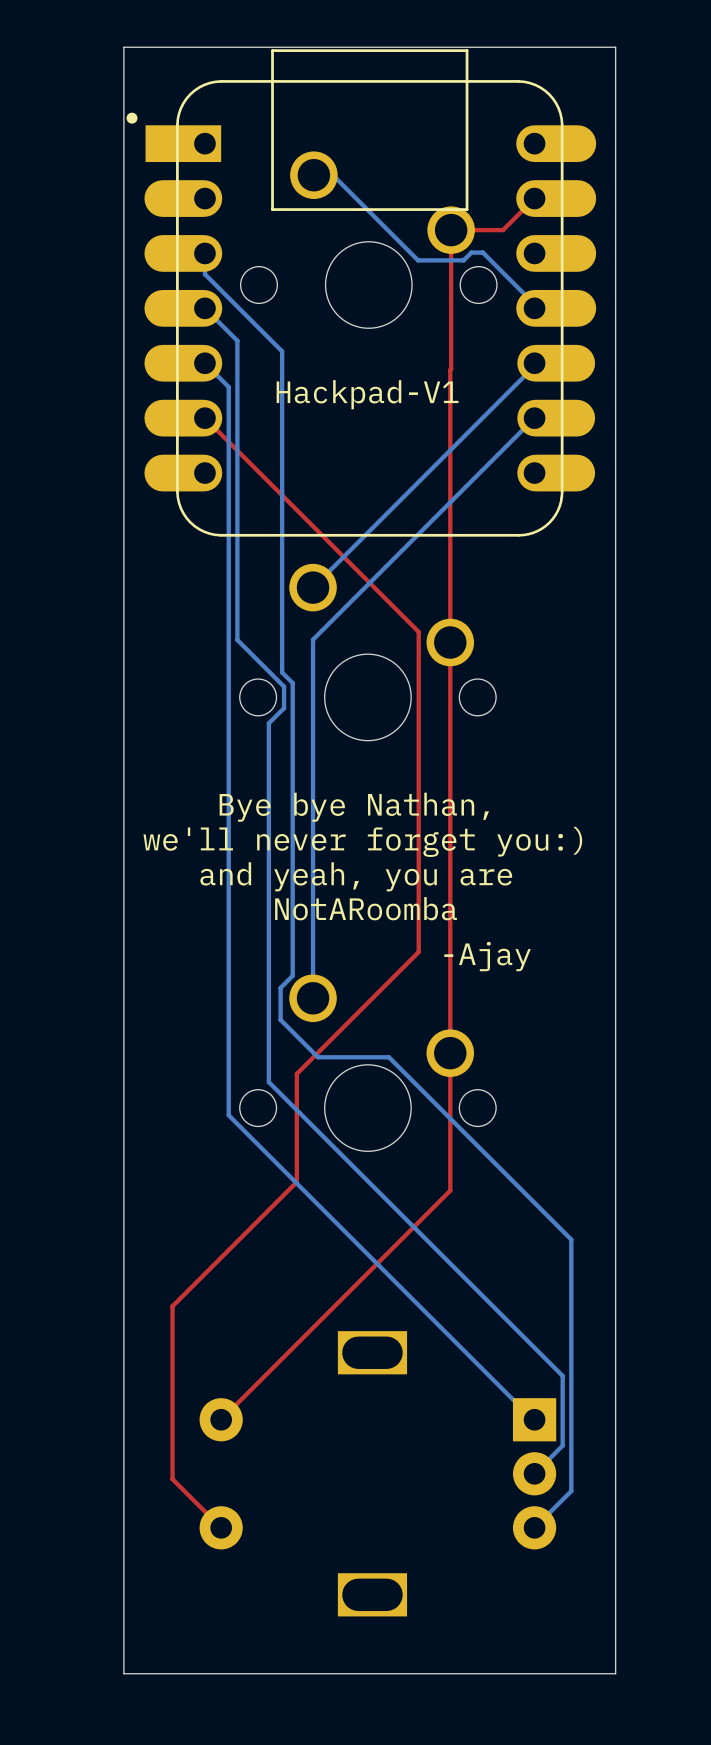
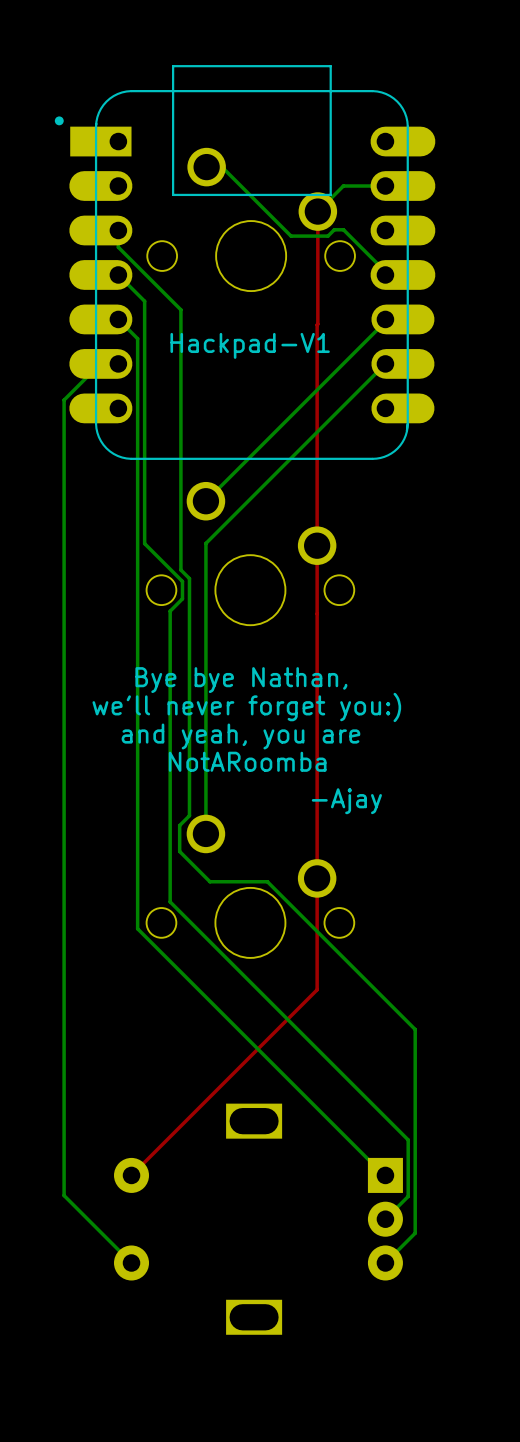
board edge: (615, 47) (123, 47) (123, 1673) (615, 1673) (615, 47) -> none
bottom track: none -> (385, 186) (343, 186) (317, 211)
top track: (534, 198) (503, 230) (451, 230) -> none
bottom track: none -> (100, 363) (64, 400) (64, 1195) (131, 1262)
top track: (204, 418) (418, 631) (418, 952) (296, 1073) (296, 1182) (172, 1306) (172, 1479) (221, 1527) -> none

